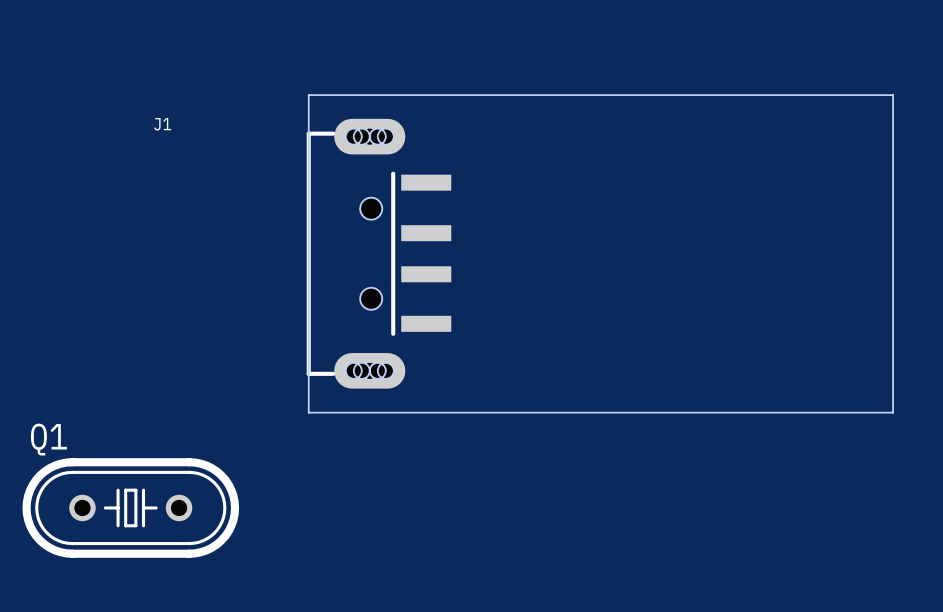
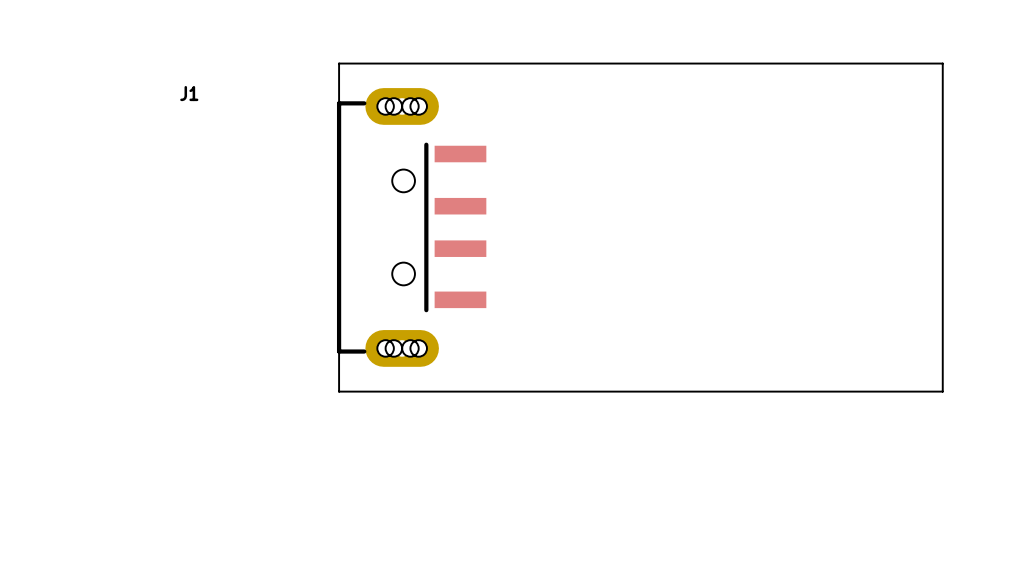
Q1: (130, 507) -> none

